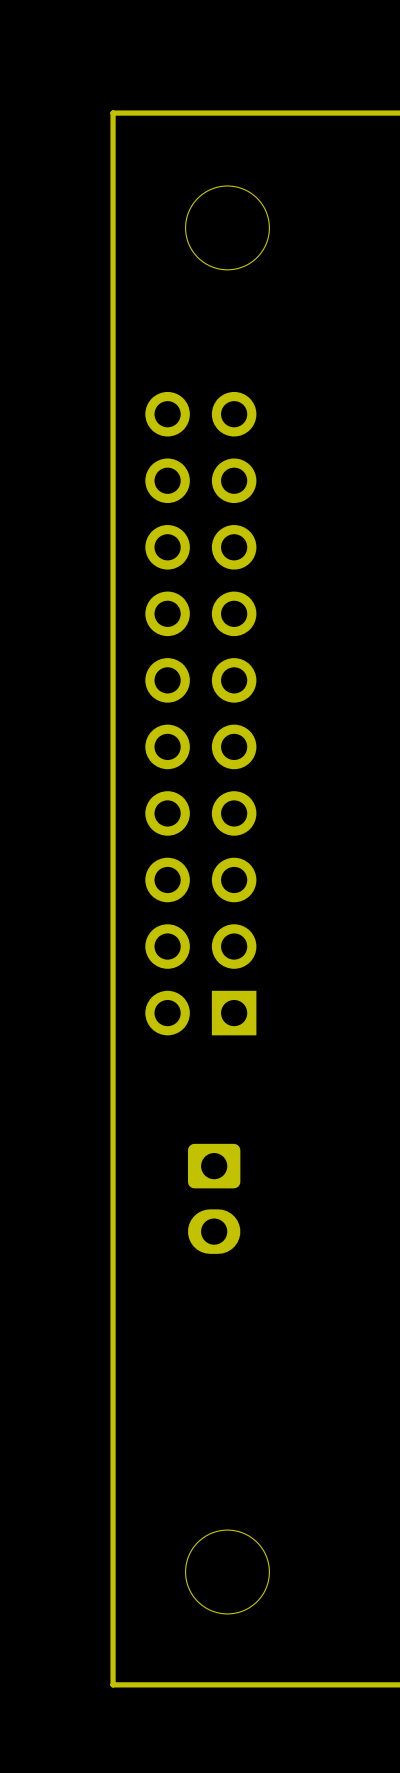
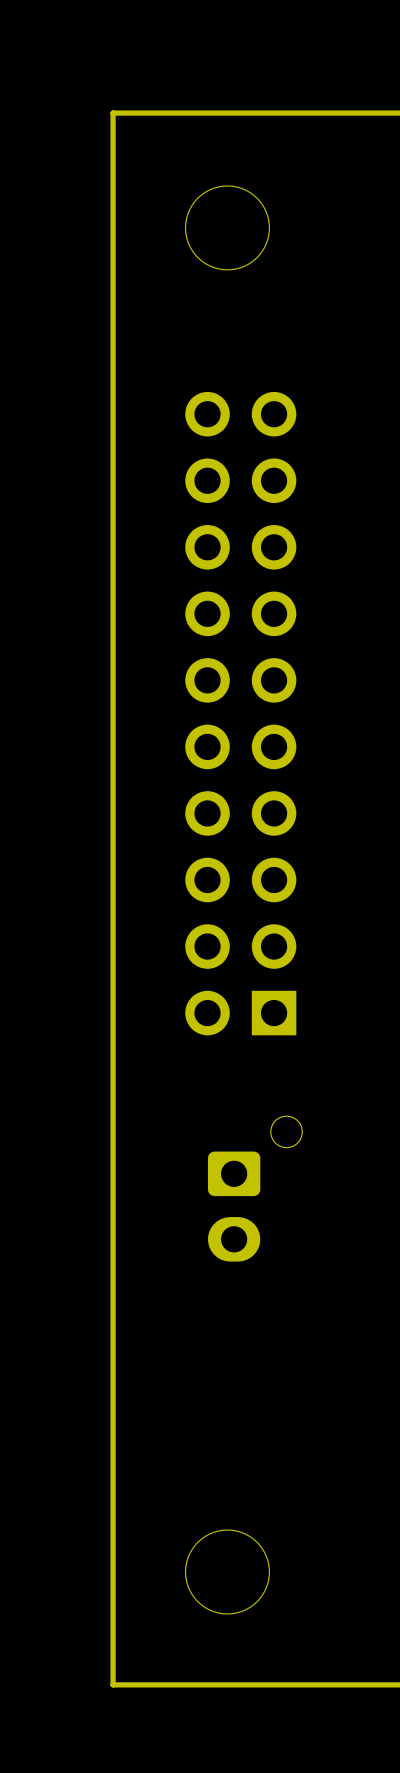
part position: (200, 713) -> (240, 713)
part: none -> (255, 1188)
part: (214, 1198) -> none

